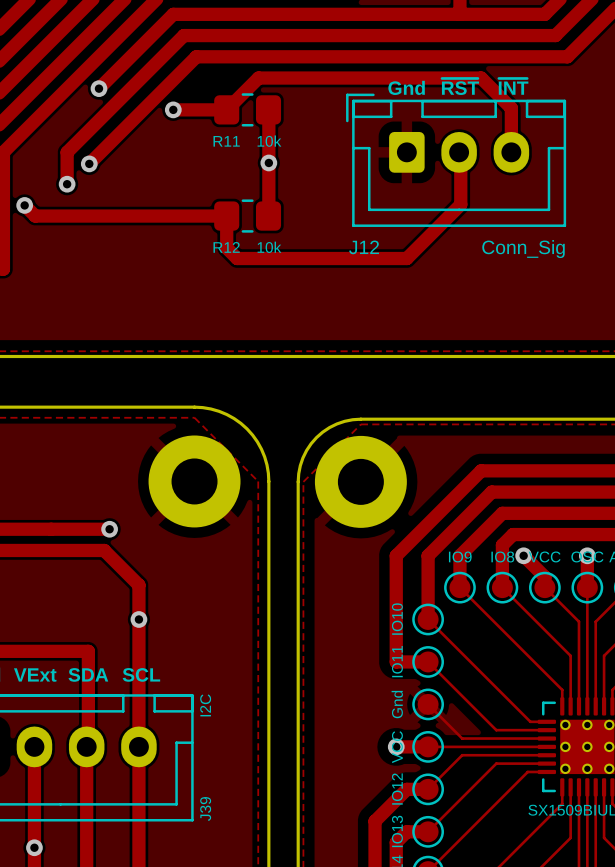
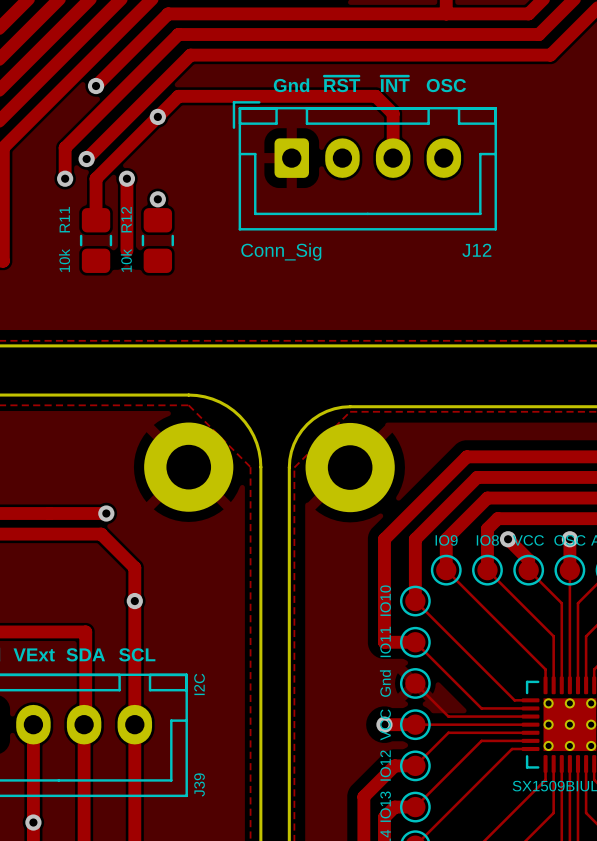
text: none -> ~{RST} (342, 84)
text: ~{RST} (460, 86) -> OSC (446, 85)
text: ~{INT} (513, 86) -> none
text: none -> Gnd (291, 85)
text: Gnd (406, 87) -> ~{INT} (395, 84)
J12 footprint: [346, 93, 567, 227] -> [232, 101, 497, 231]
track: (173, 109) (226, 109) (258, 78) (481, 78) (511, 108) (511, 152) -> none
via position: (173, 109) -> (157, 116)
R11 rotation: 0° (247, 109) -> 90° clockwise (96, 240)
R11 position: (247, 109) -> (96, 240)
track: (268, 109) (268, 216) -> none
via: (268, 162) -> none
track: none -> (393, 158) (393, 113) (375, 96) (178, 96) (96, 178) (96, 220)
track: (460, 162) (460, 204) (406, 258) (237, 258) (226, 248) (226, 216) (35, 216) (24, 205) -> none
track: none -> (126, 178) (126, 250)
via: none -> (126, 178)
via: (24, 205) -> none
via: none -> (157, 199)
R12 rotation: 0° (247, 216) -> 90° clockwise (157, 240)
R12 position: (247, 216) -> (157, 240)
J12 name position: J12 (364, 247) -> J12 (476, 250)
J12 value position: Conn_Sig (523, 249) -> Conn_Sig (281, 251)

